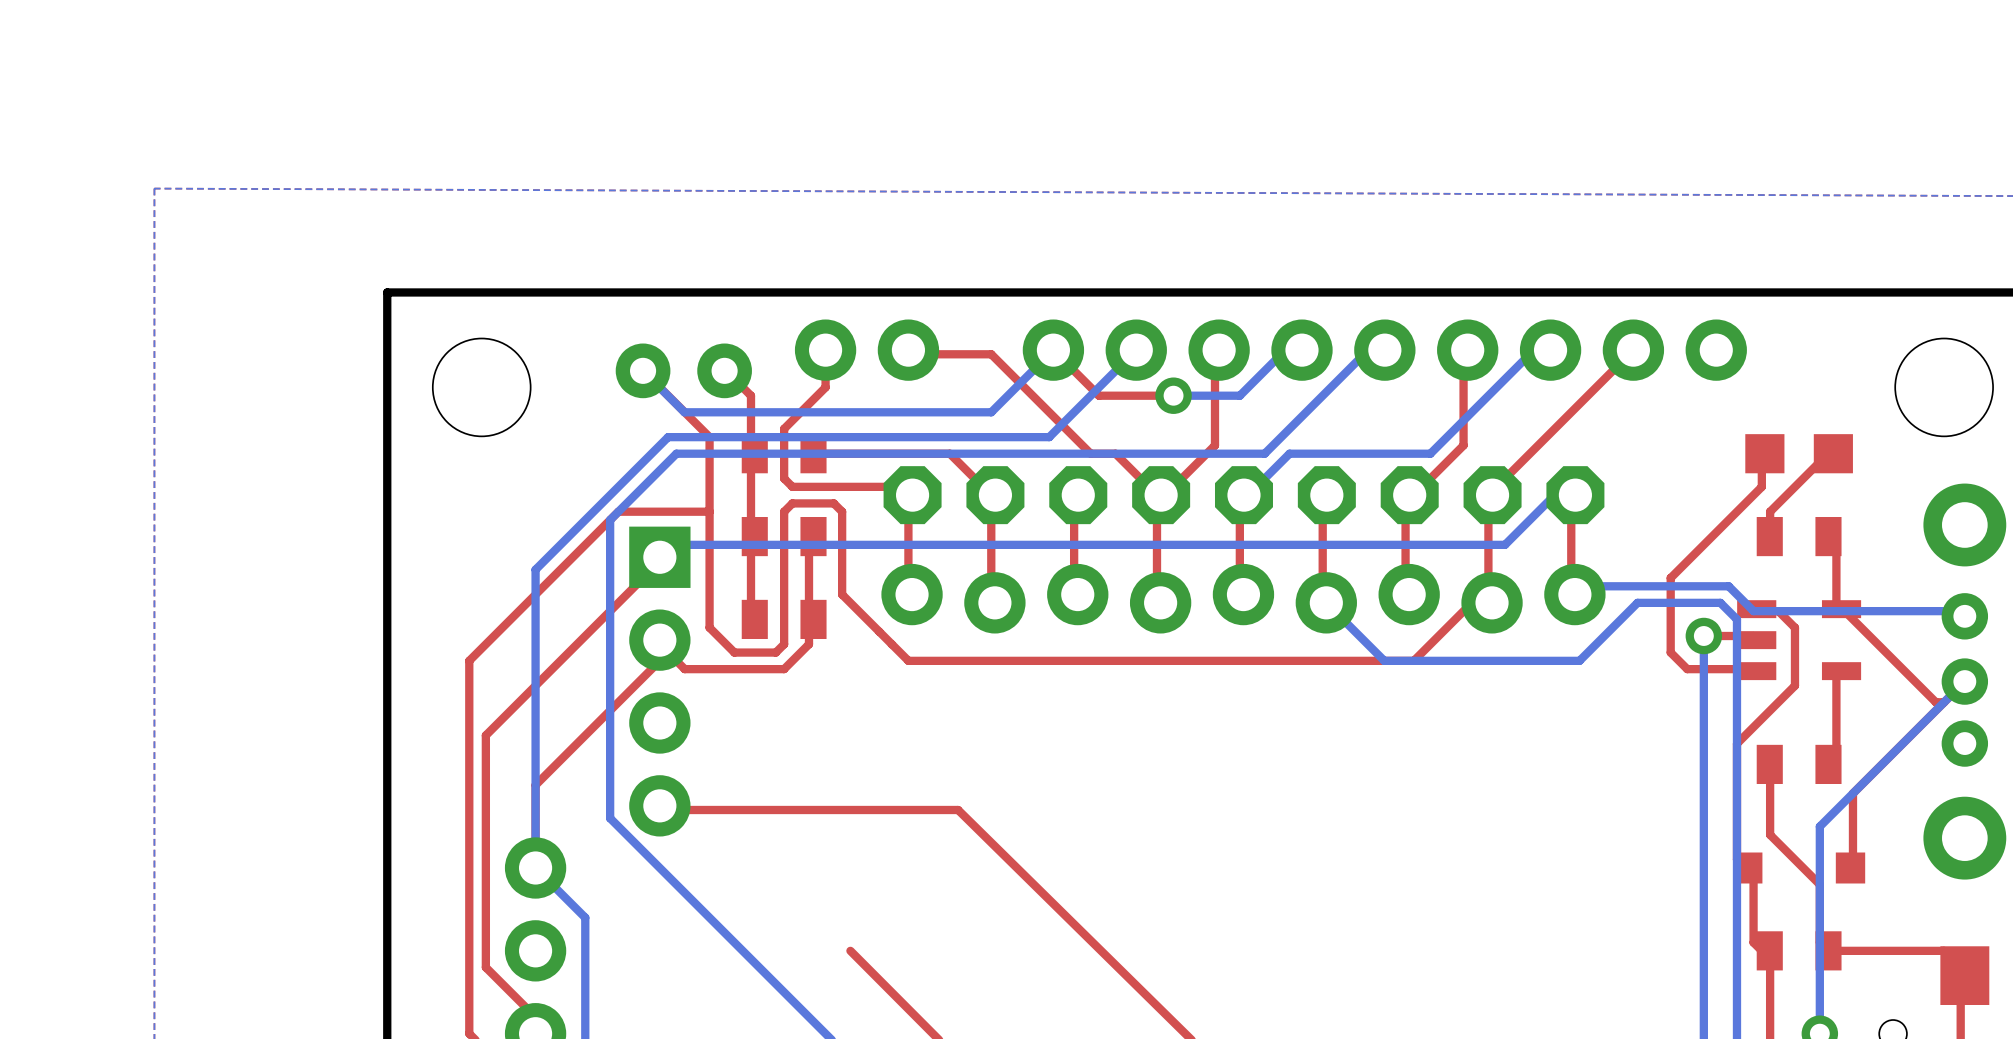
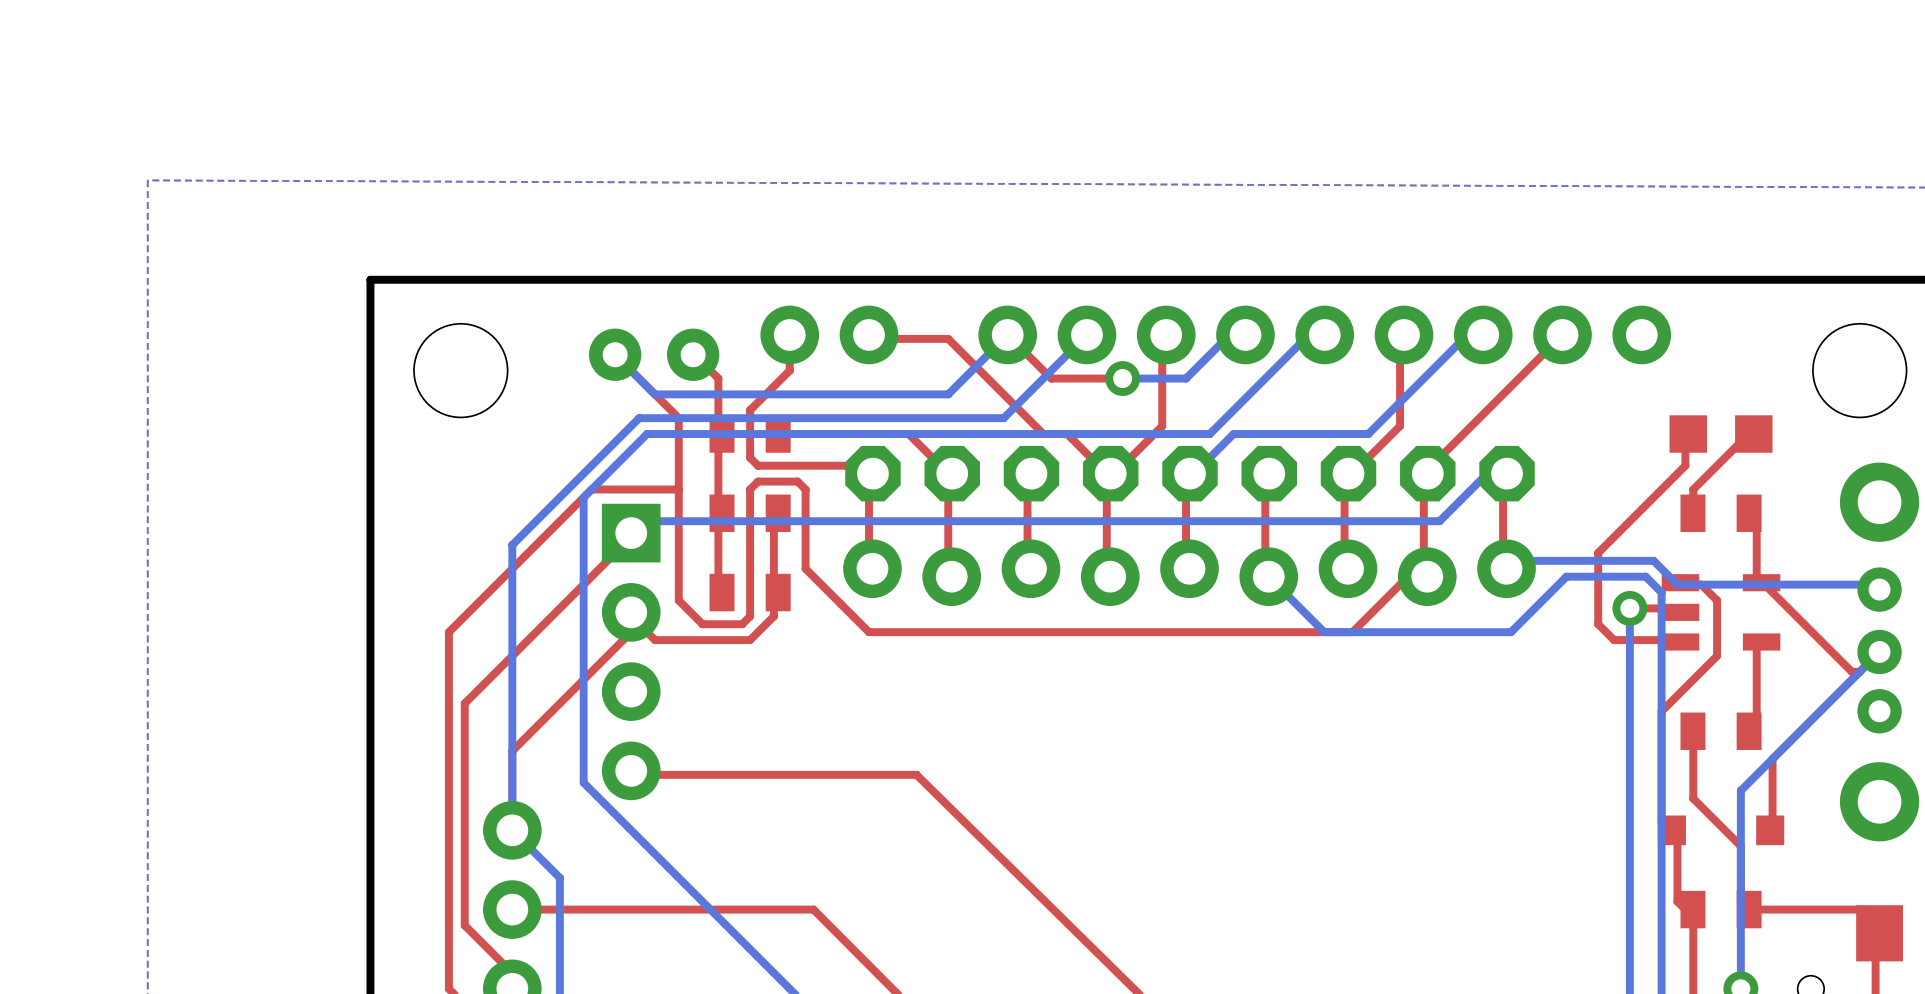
top track: none -> (813, 909) (512, 909)

